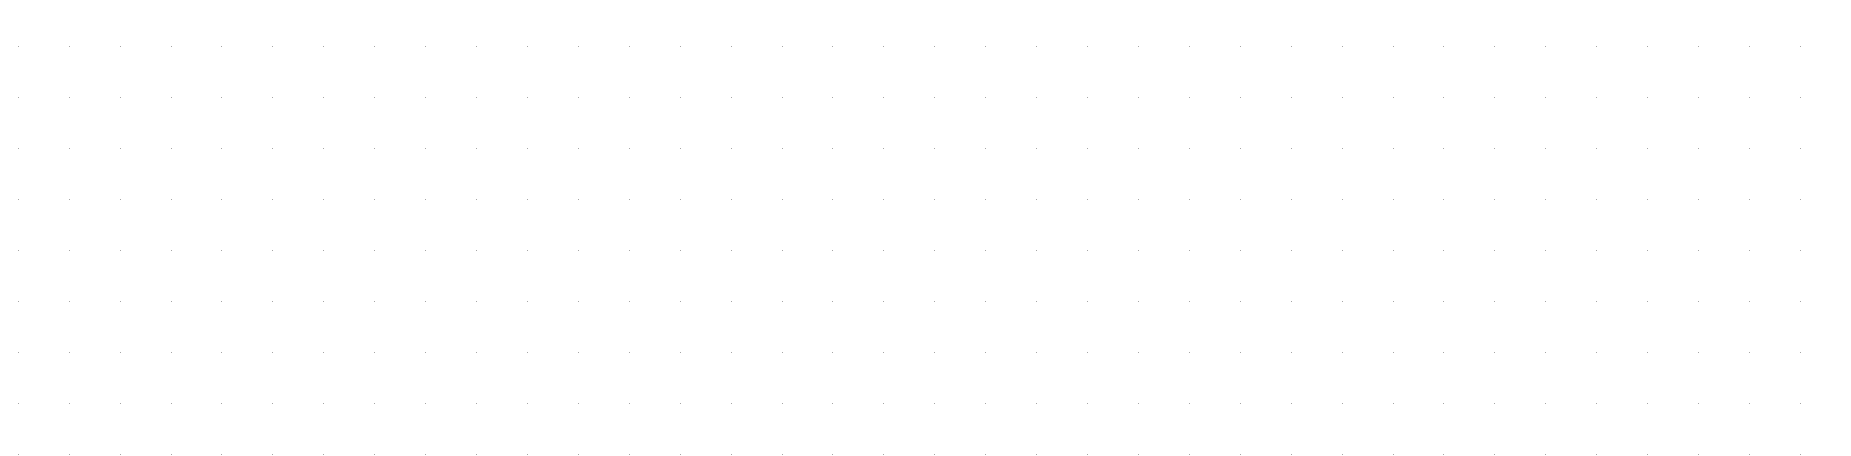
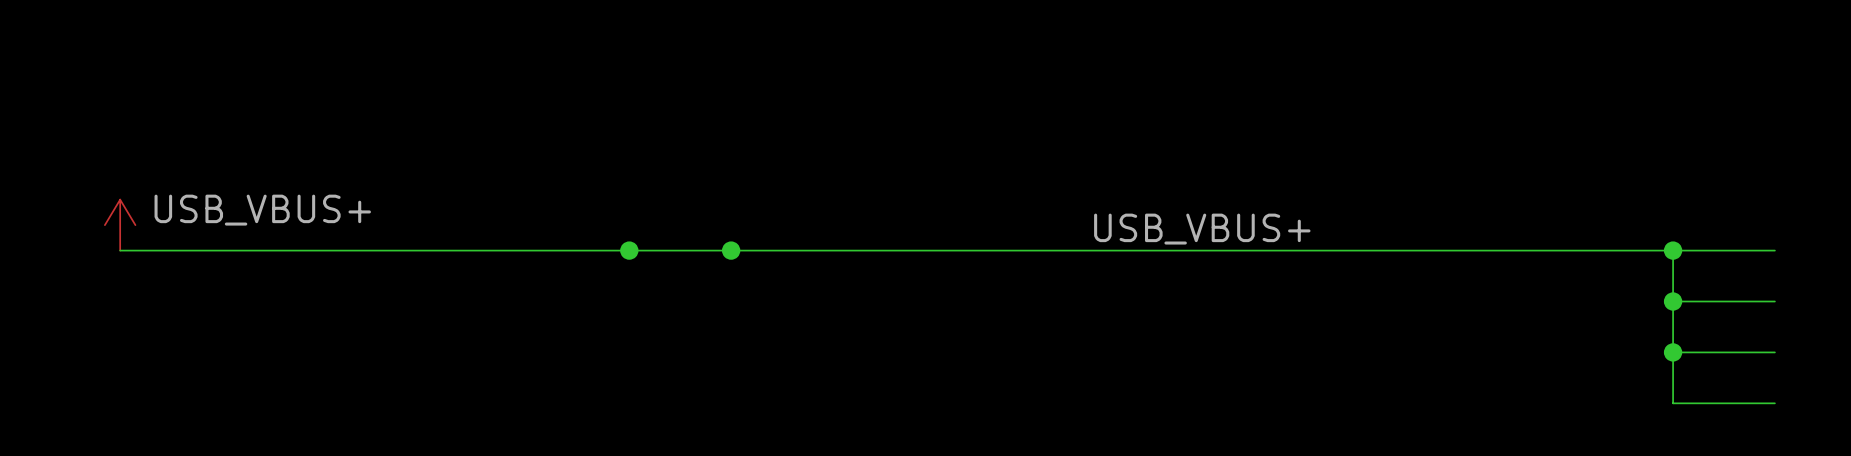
power symbol: none -> USB_VBUS+ (120, 225)
label: none -> USB_VBUS+ (1202, 229)
wire: none -> (120, 250) (1774, 250)
junction: none -> (629, 250)
junction: none -> (731, 250)
wire: none -> (1673, 250) (1673, 403) (1774, 403)
junction: none -> (1673, 250)
wire: none -> (1673, 301) (1774, 301)
junction: none -> (1673, 301)
wire: none -> (1673, 352) (1774, 352)
junction: none -> (1673, 352)

